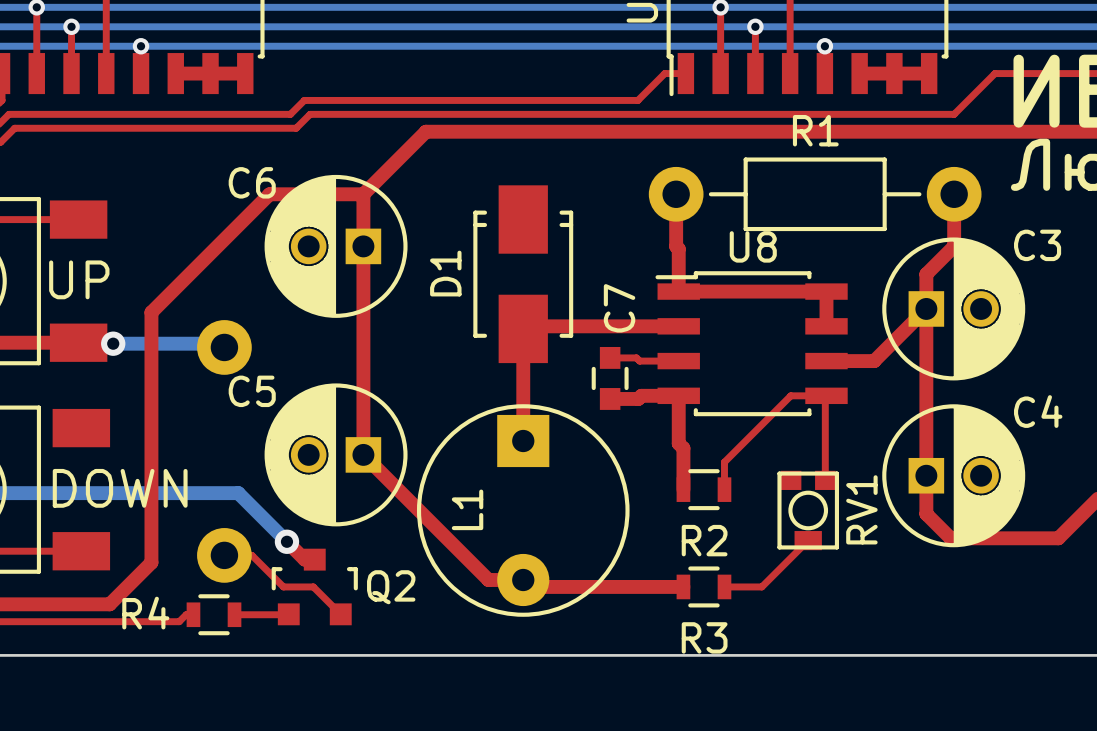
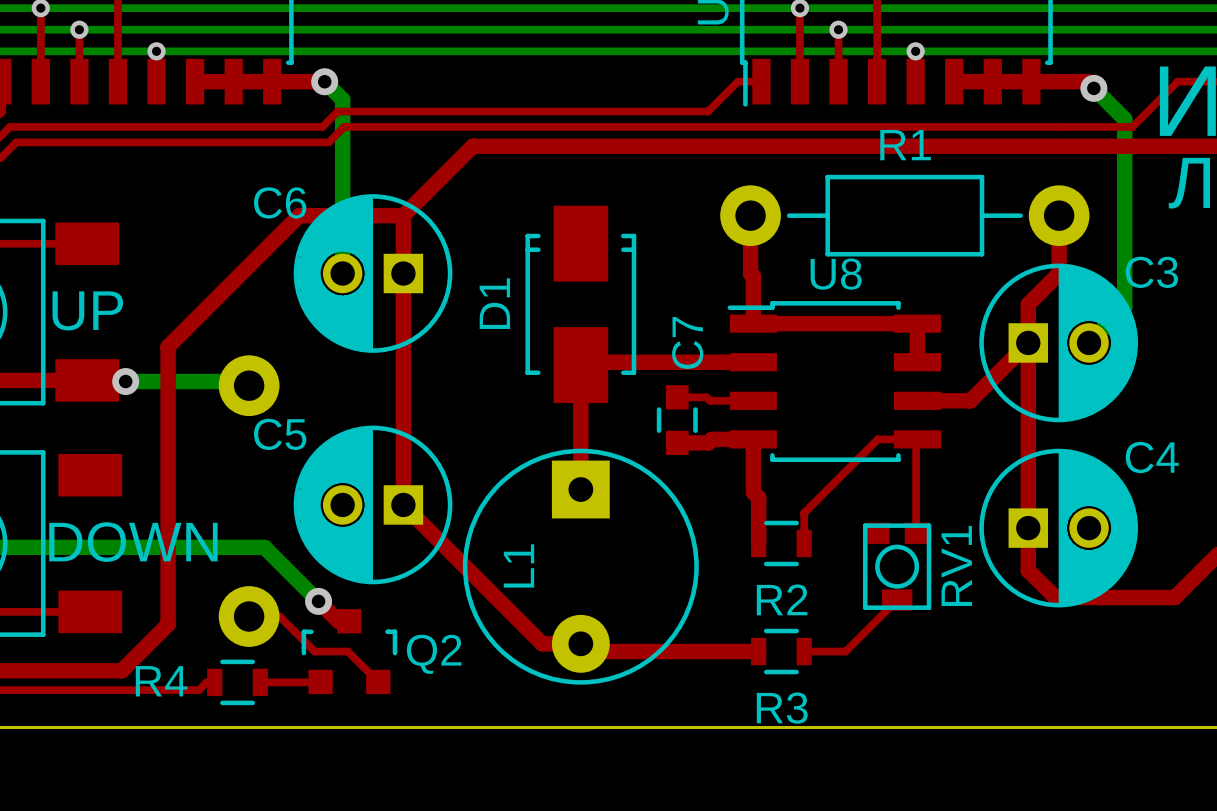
top track: none -> (272, 81) (324, 81)
bottom track: none -> (324, 81) (342, 99) (342, 273)
via: none -> (324, 81)
top track: none -> (1031, 81) (1087, 81) (1093, 88)
top track: (1060, 73) (994, 73) (954, 114) -> (1177, 81) (1132, 126) (1059, 126)
bottom track: none -> (1093, 88) (1124, 119) (1124, 307) (1089, 342)
via: none -> (1093, 88)

